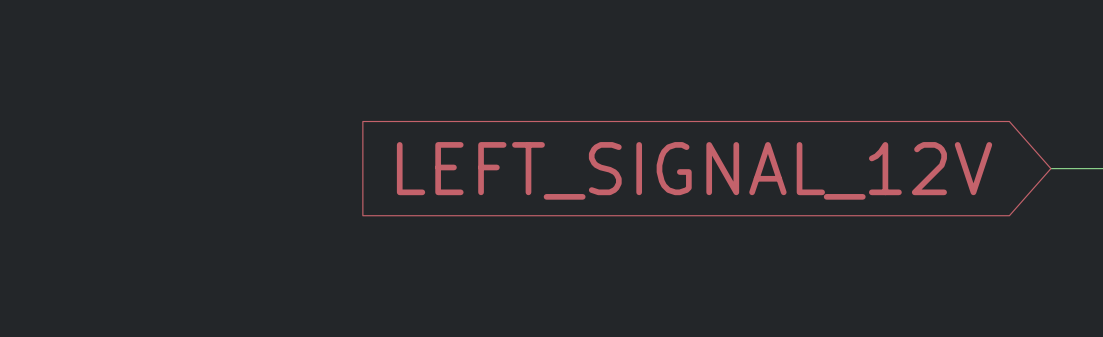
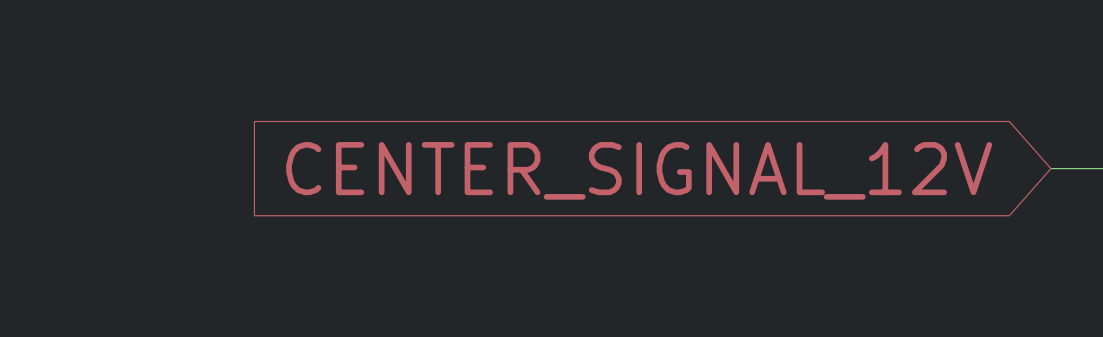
global label: LEFT_SIGNAL_12V (694, 170) -> CENTER_SIGNAL_12V (639, 170)

